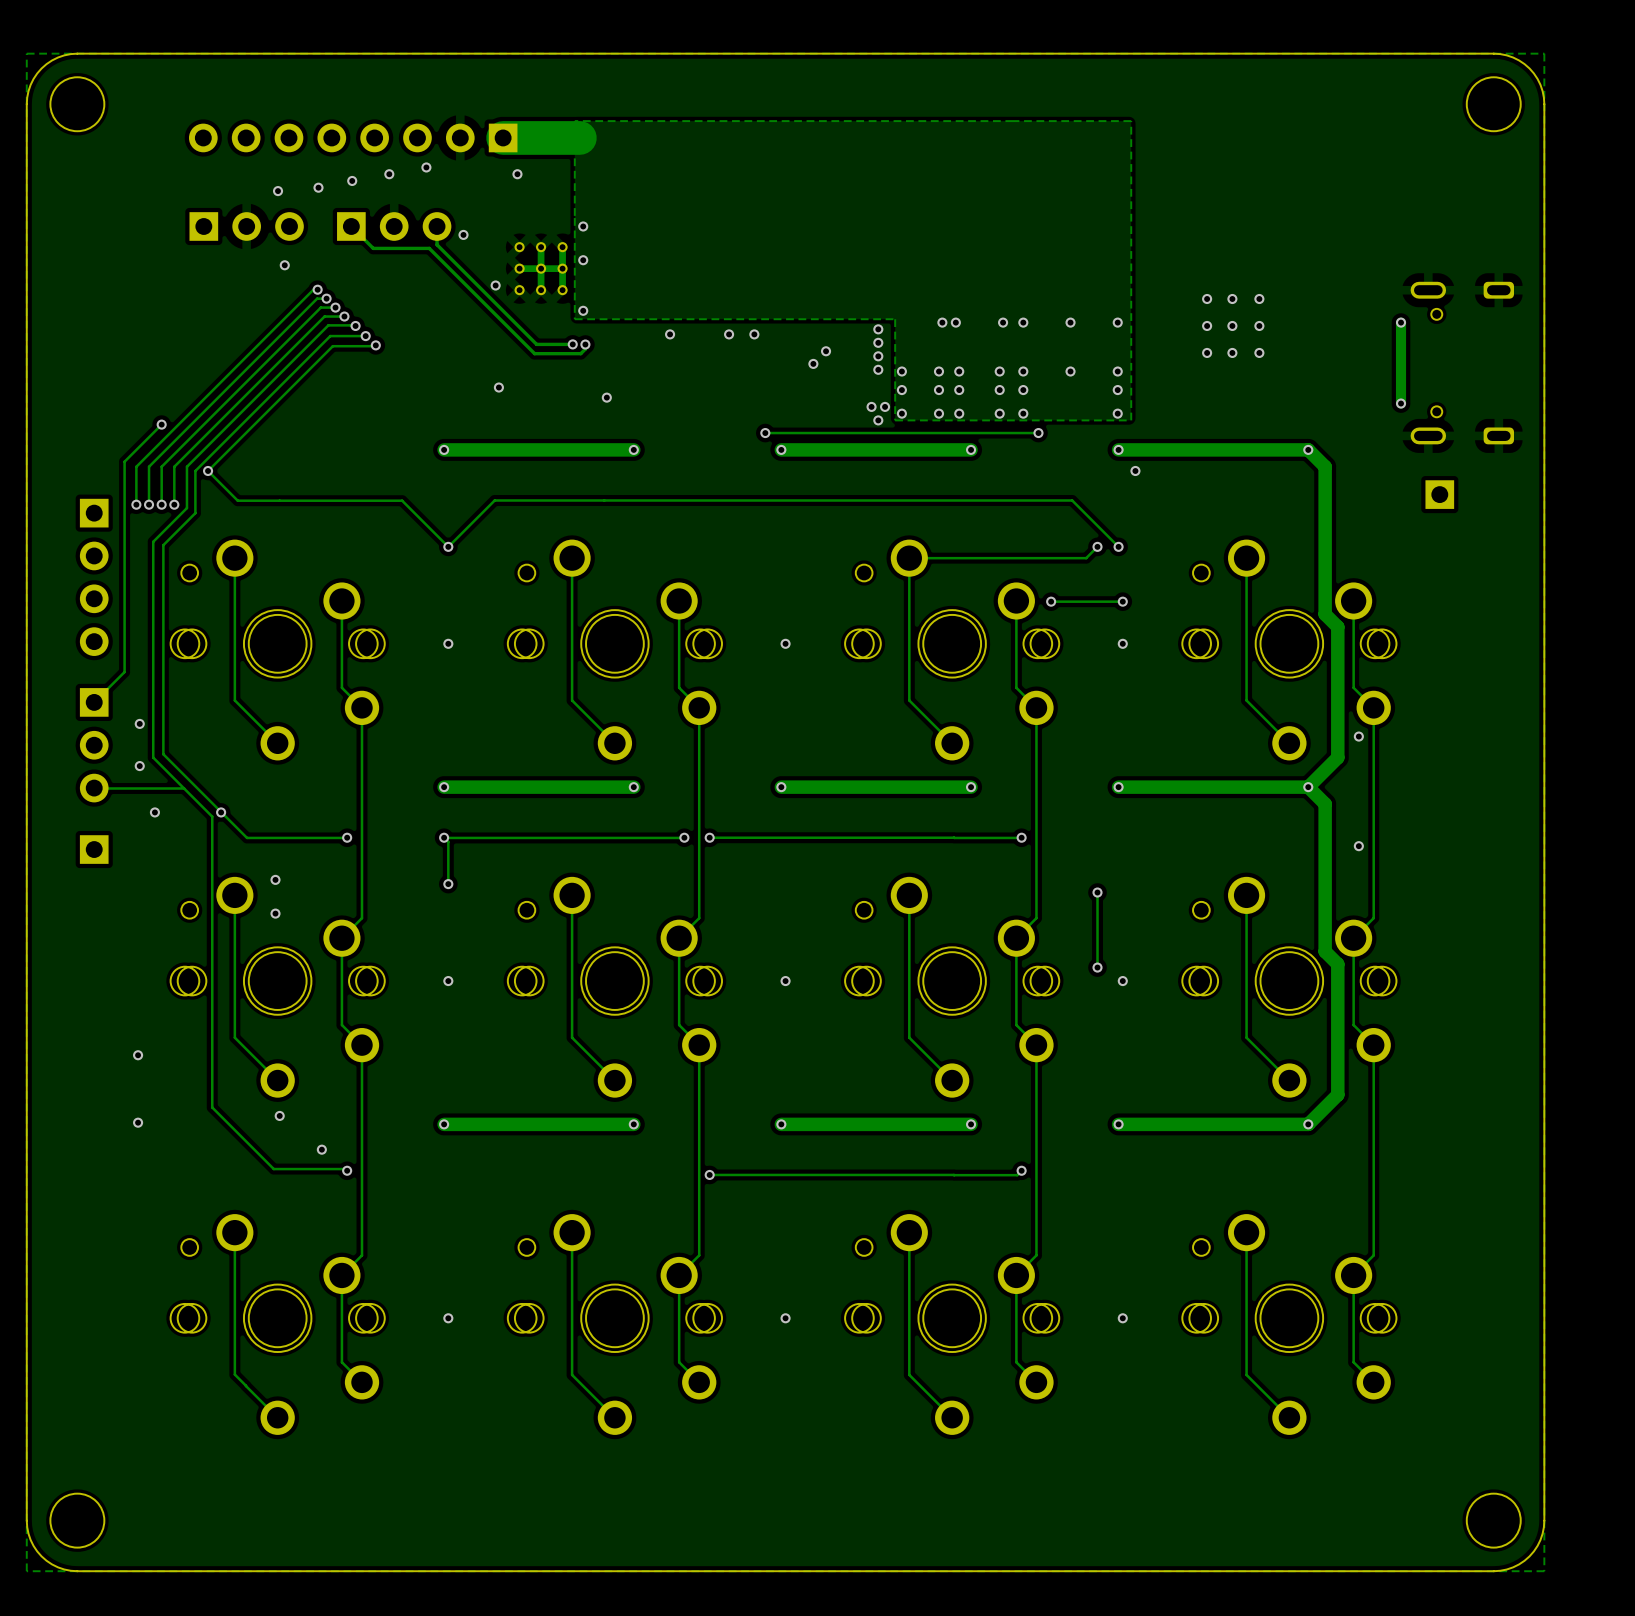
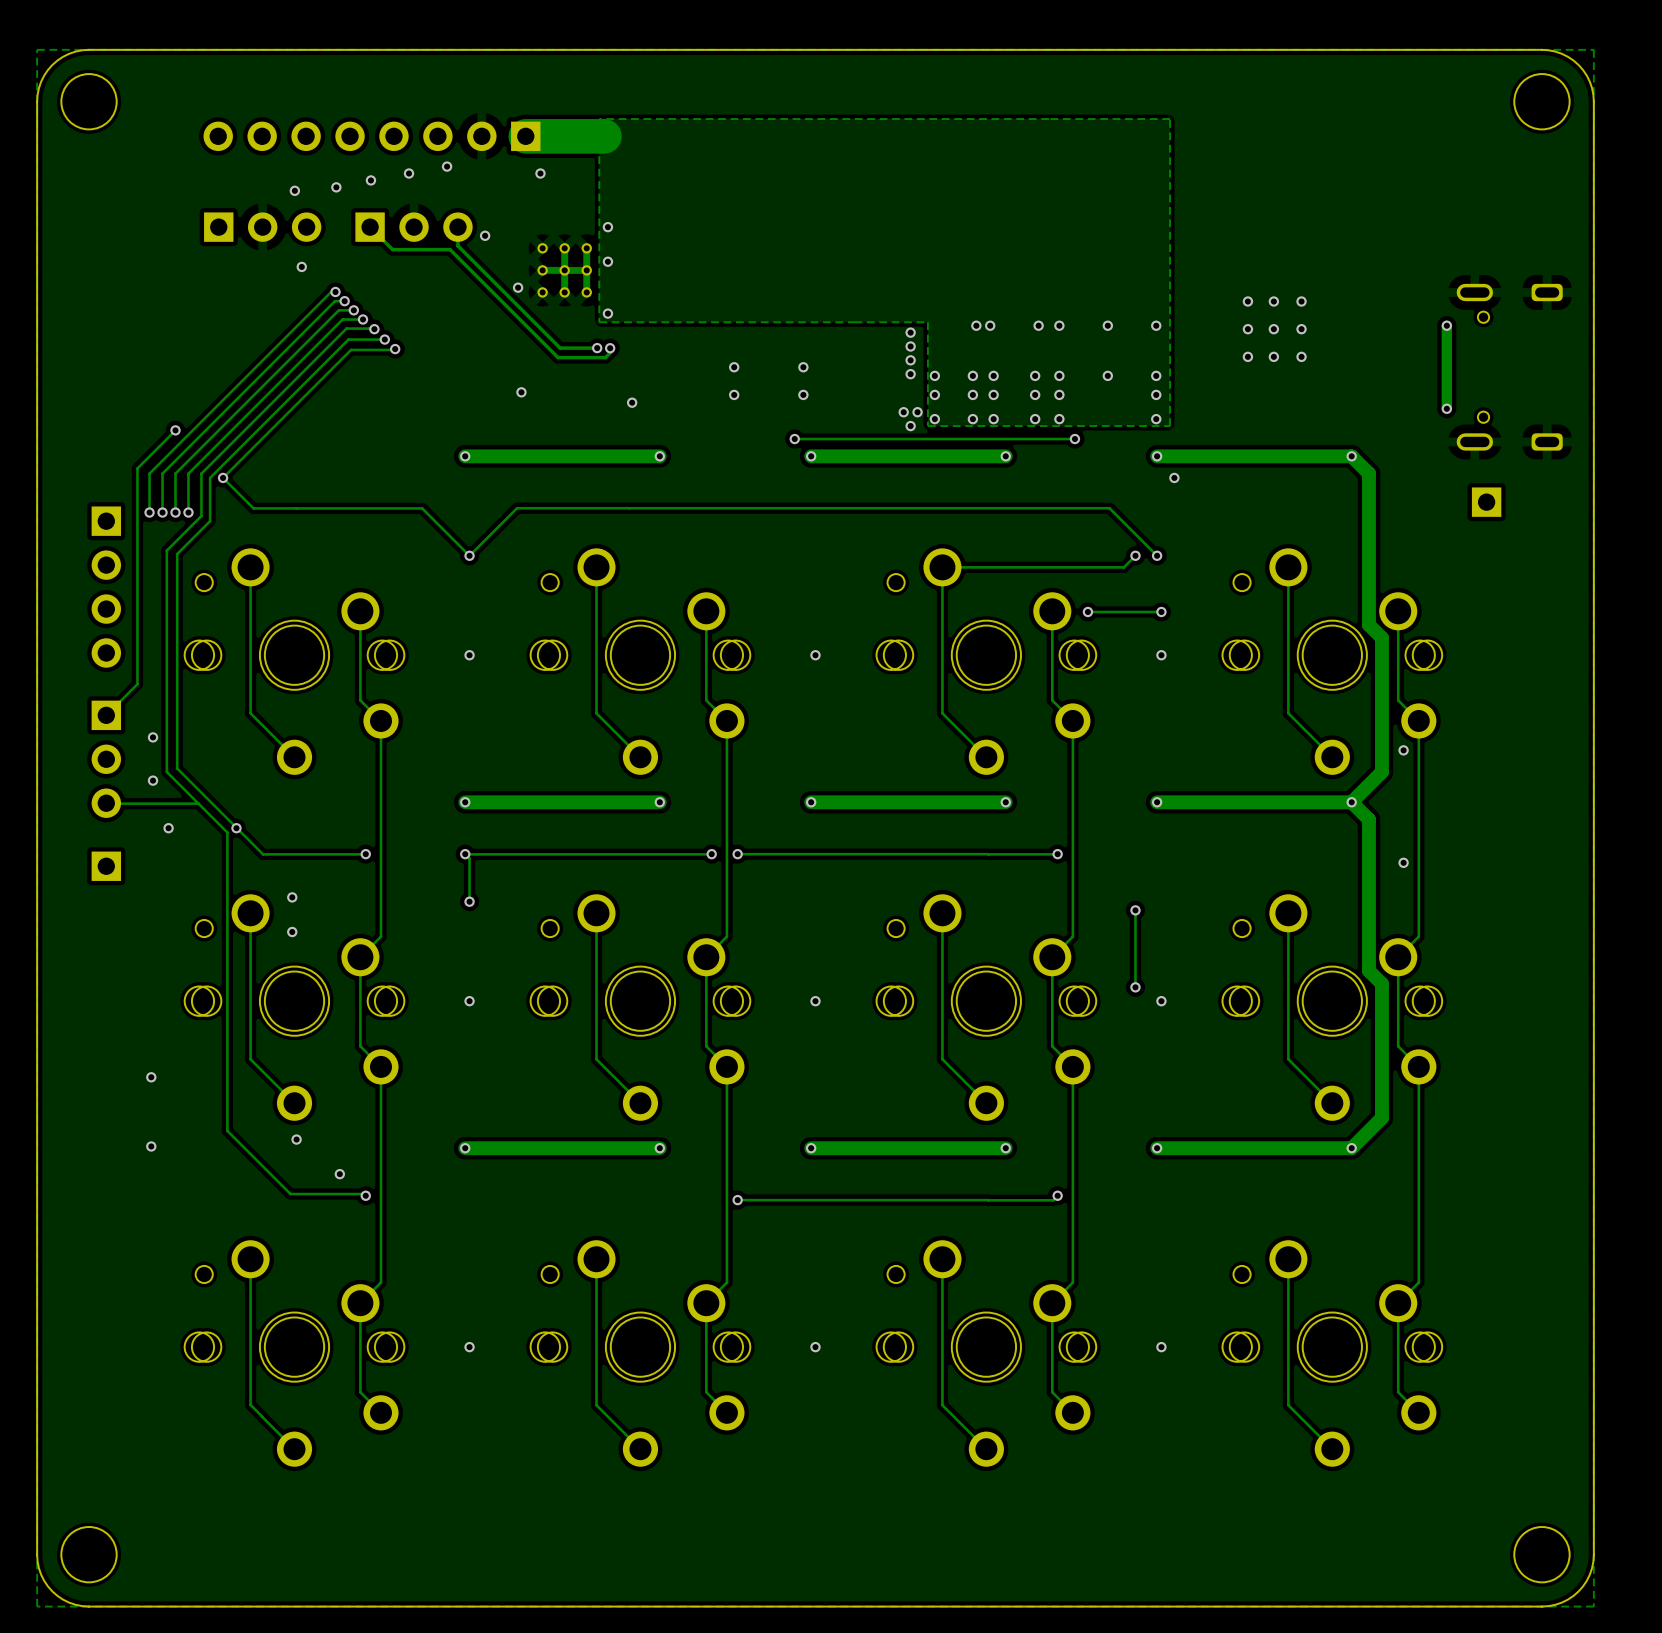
via: (670, 334) -> none
via: (729, 334) -> none
via: (754, 334) -> none
via: (826, 351) -> none
via: none -> (734, 367)
via: none -> (803, 367)
via: (813, 363) -> none
via: none -> (734, 394)
via: none -> (803, 394)

